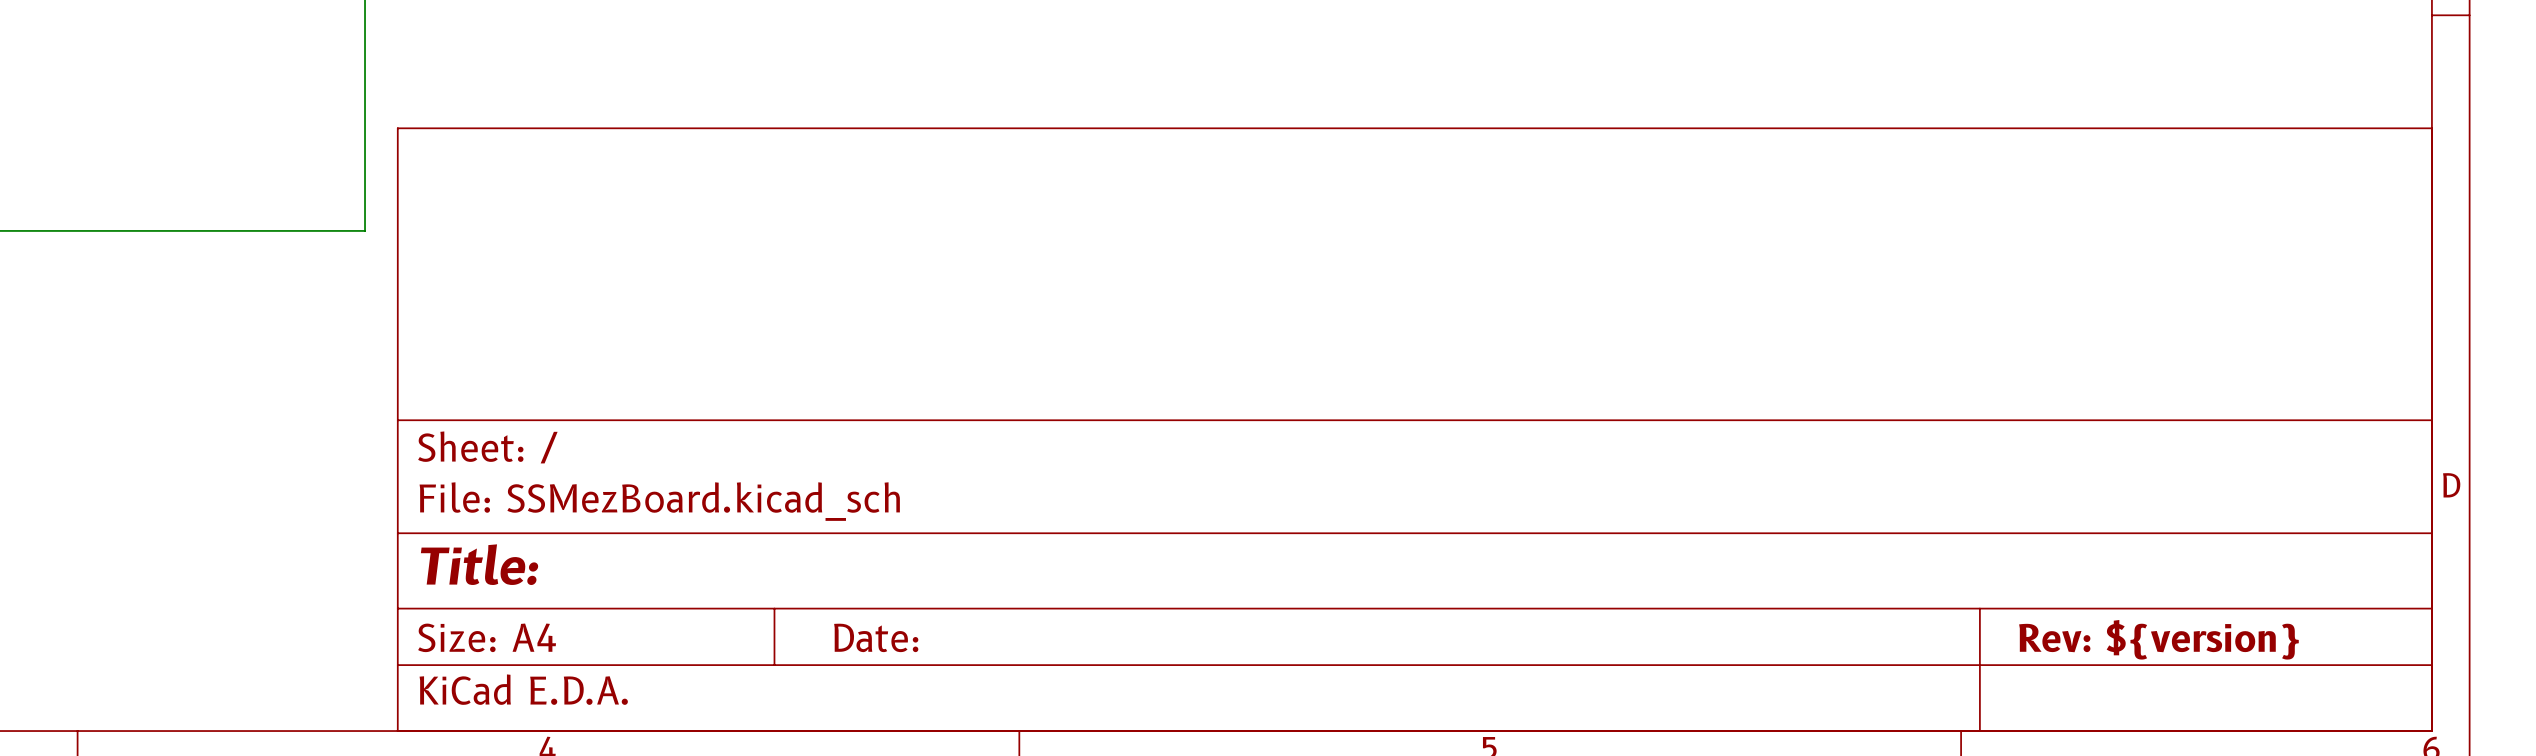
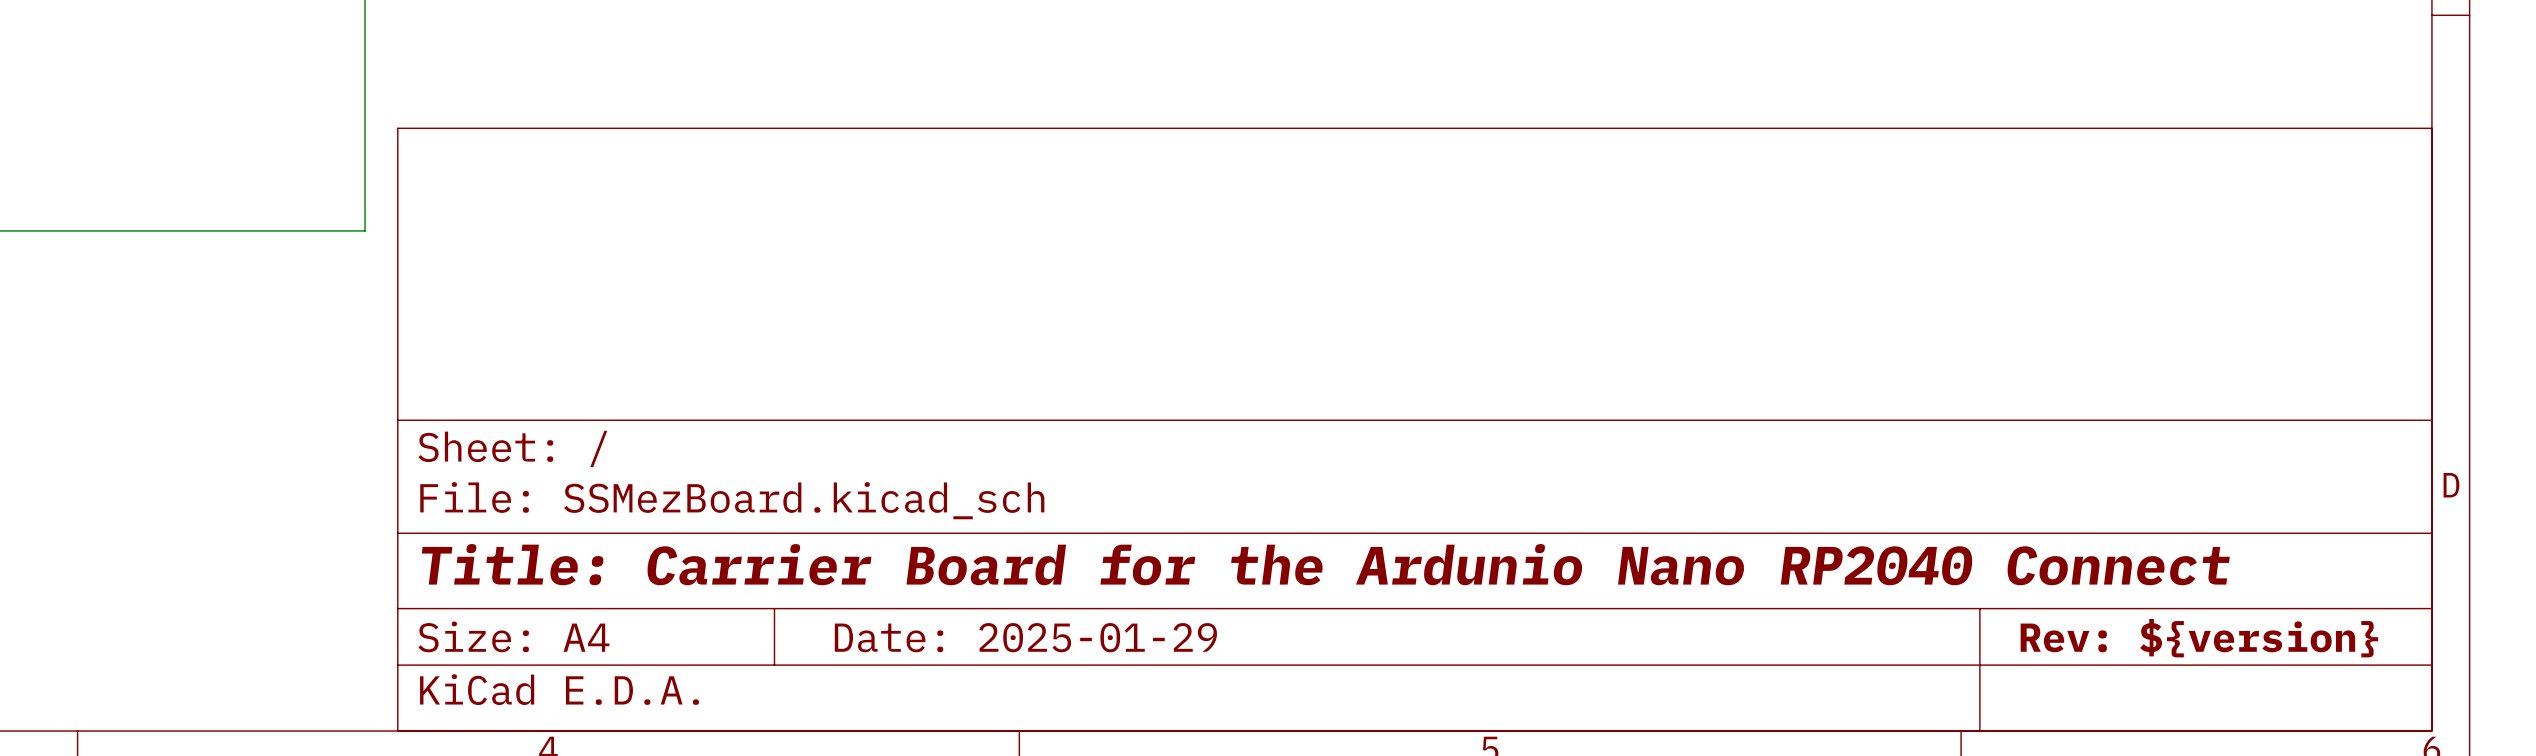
title block: Title: (479, 564) -> Title: Carrier Board for the Ardunio Nano RP2040 Connect (1325, 564)
title block: Date: (876, 637) -> Date: 2025-01-29 (1025, 637)

